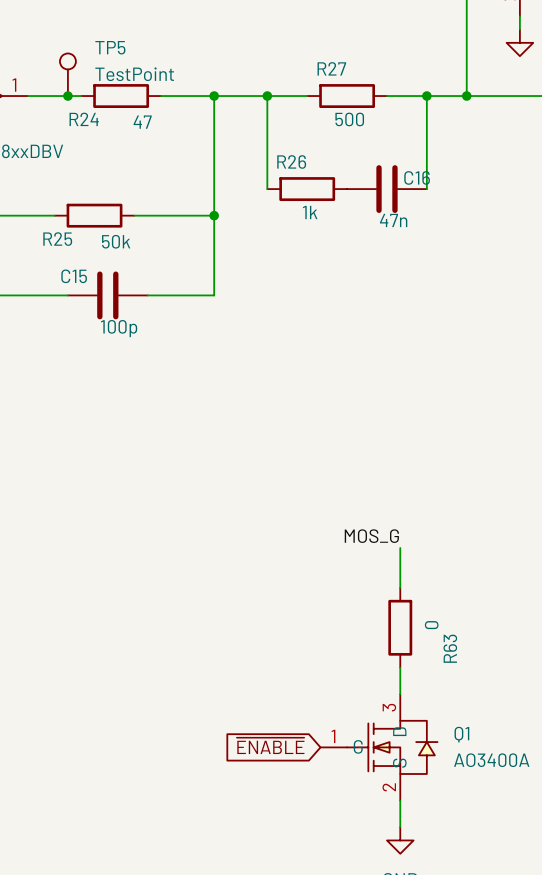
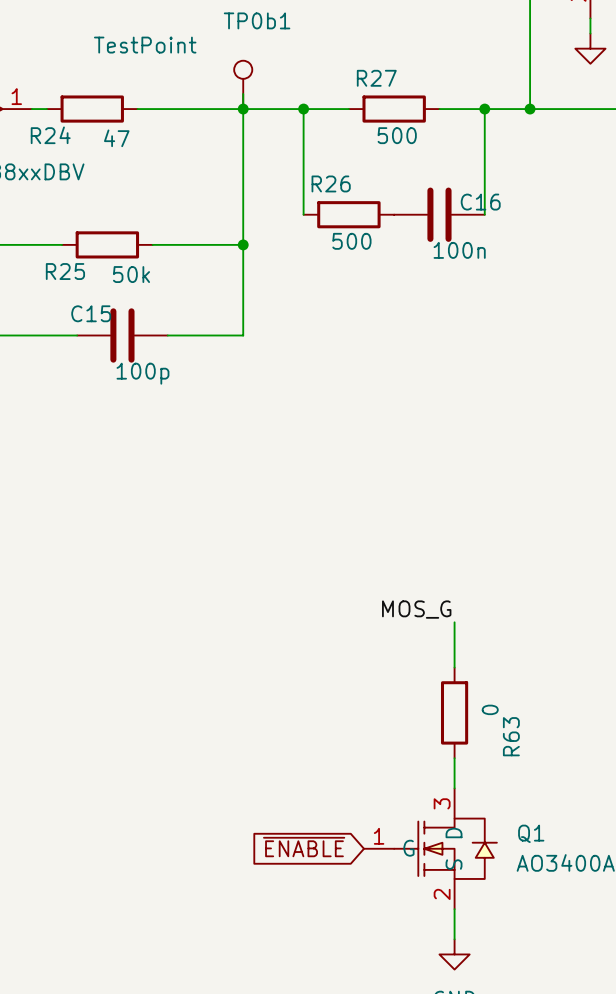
TP5: TestPoint (67, 74) -> none
TP0b1: none -> TestPoint (243, 84)
wire: none -> (243, 93) (243, 109)
wire: (41, 96) (81, 96) -> (137, 109) (182, 109)
junction: (67, 96) -> none
R24 position: (121, 96) -> (92, 109)
R26 value: 1k (310, 212) -> 500 (351, 241)
C16 value: 47n (393, 220) -> 100n (459, 250)

